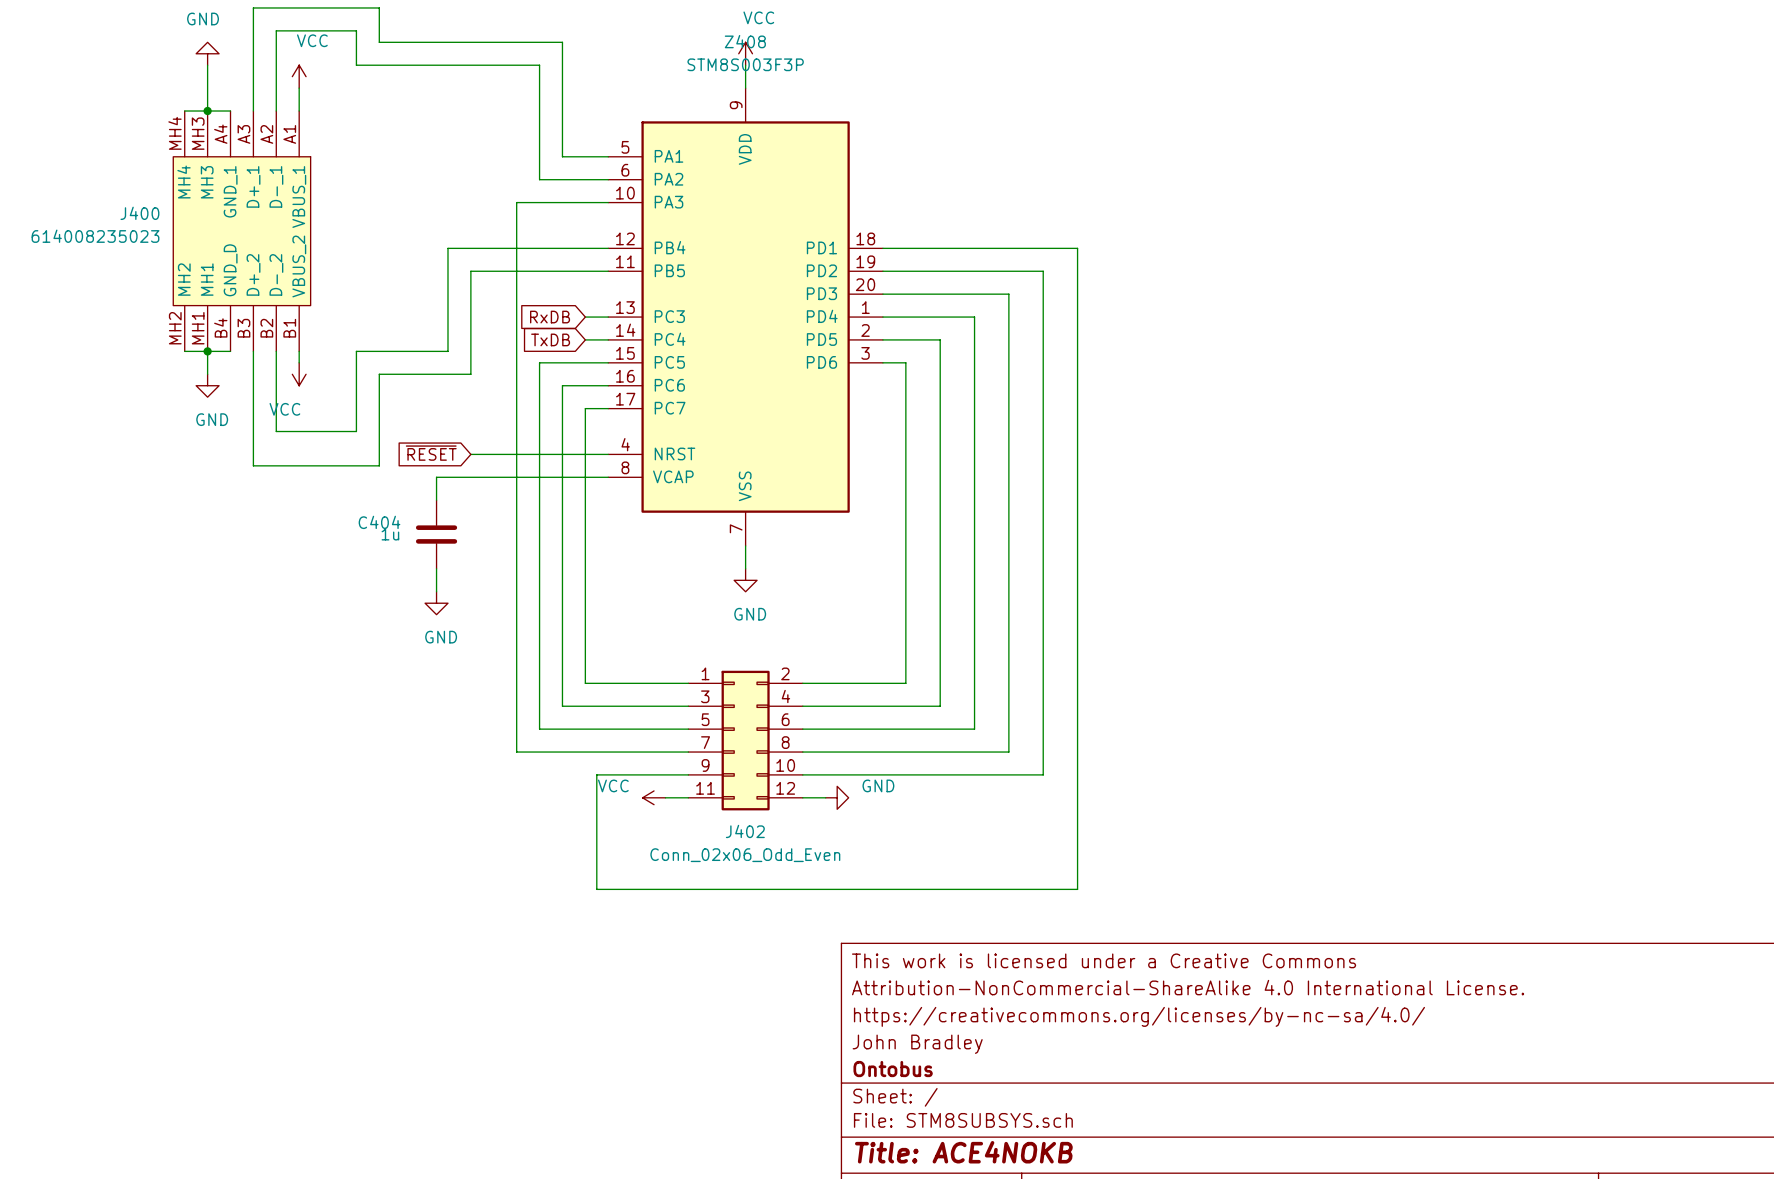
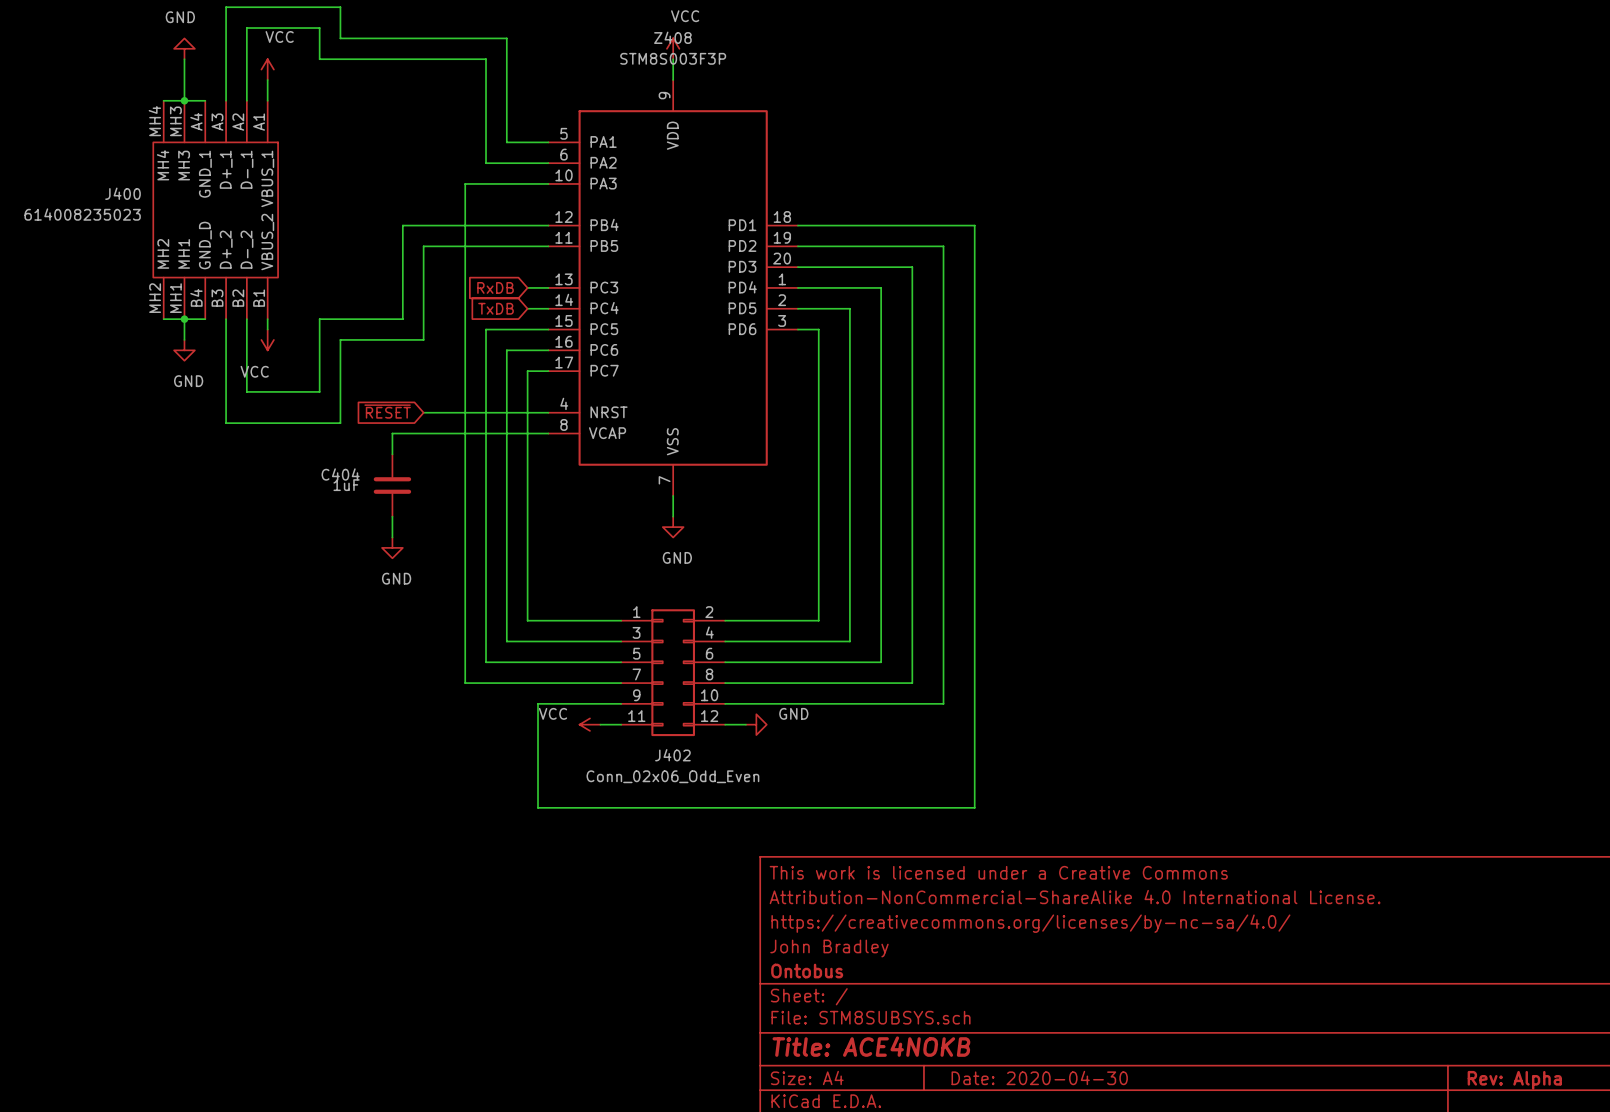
C404 value: 1u (390, 534) -> 1uF (346, 485)

